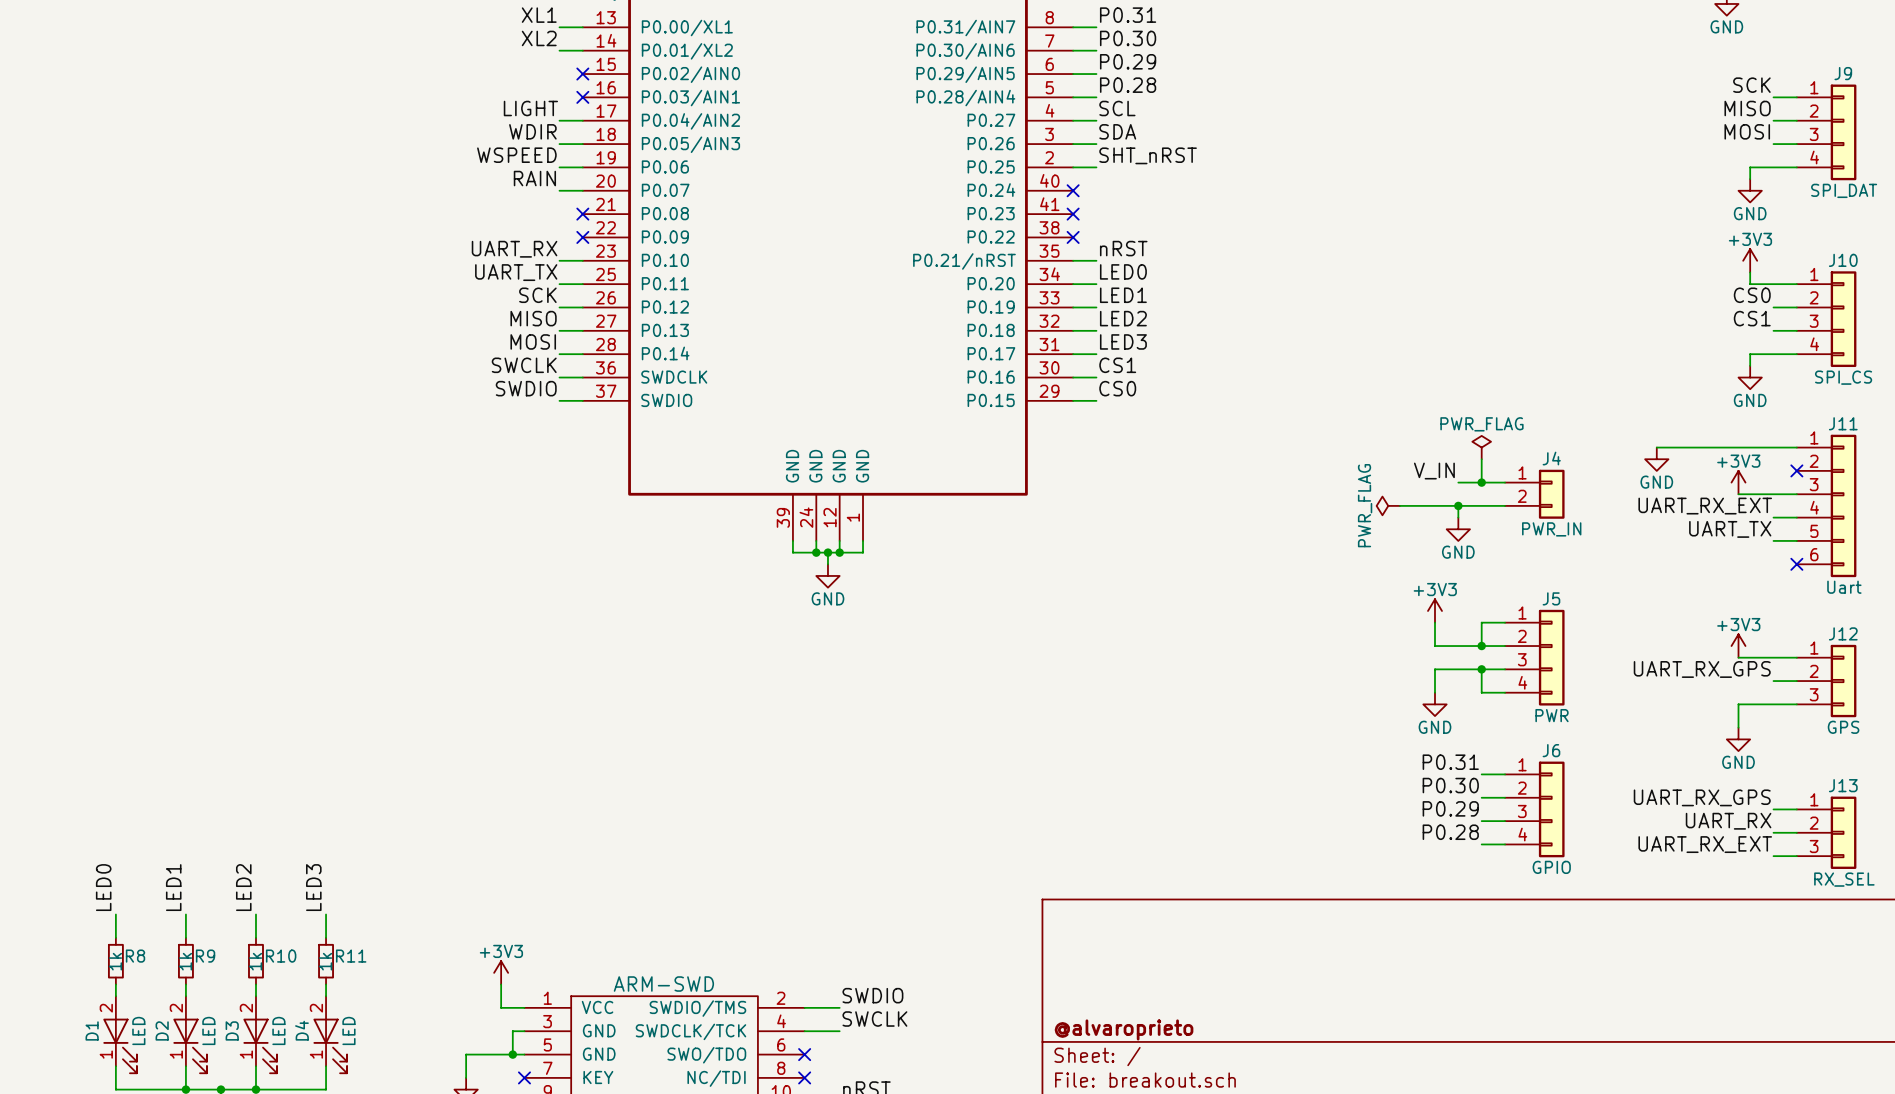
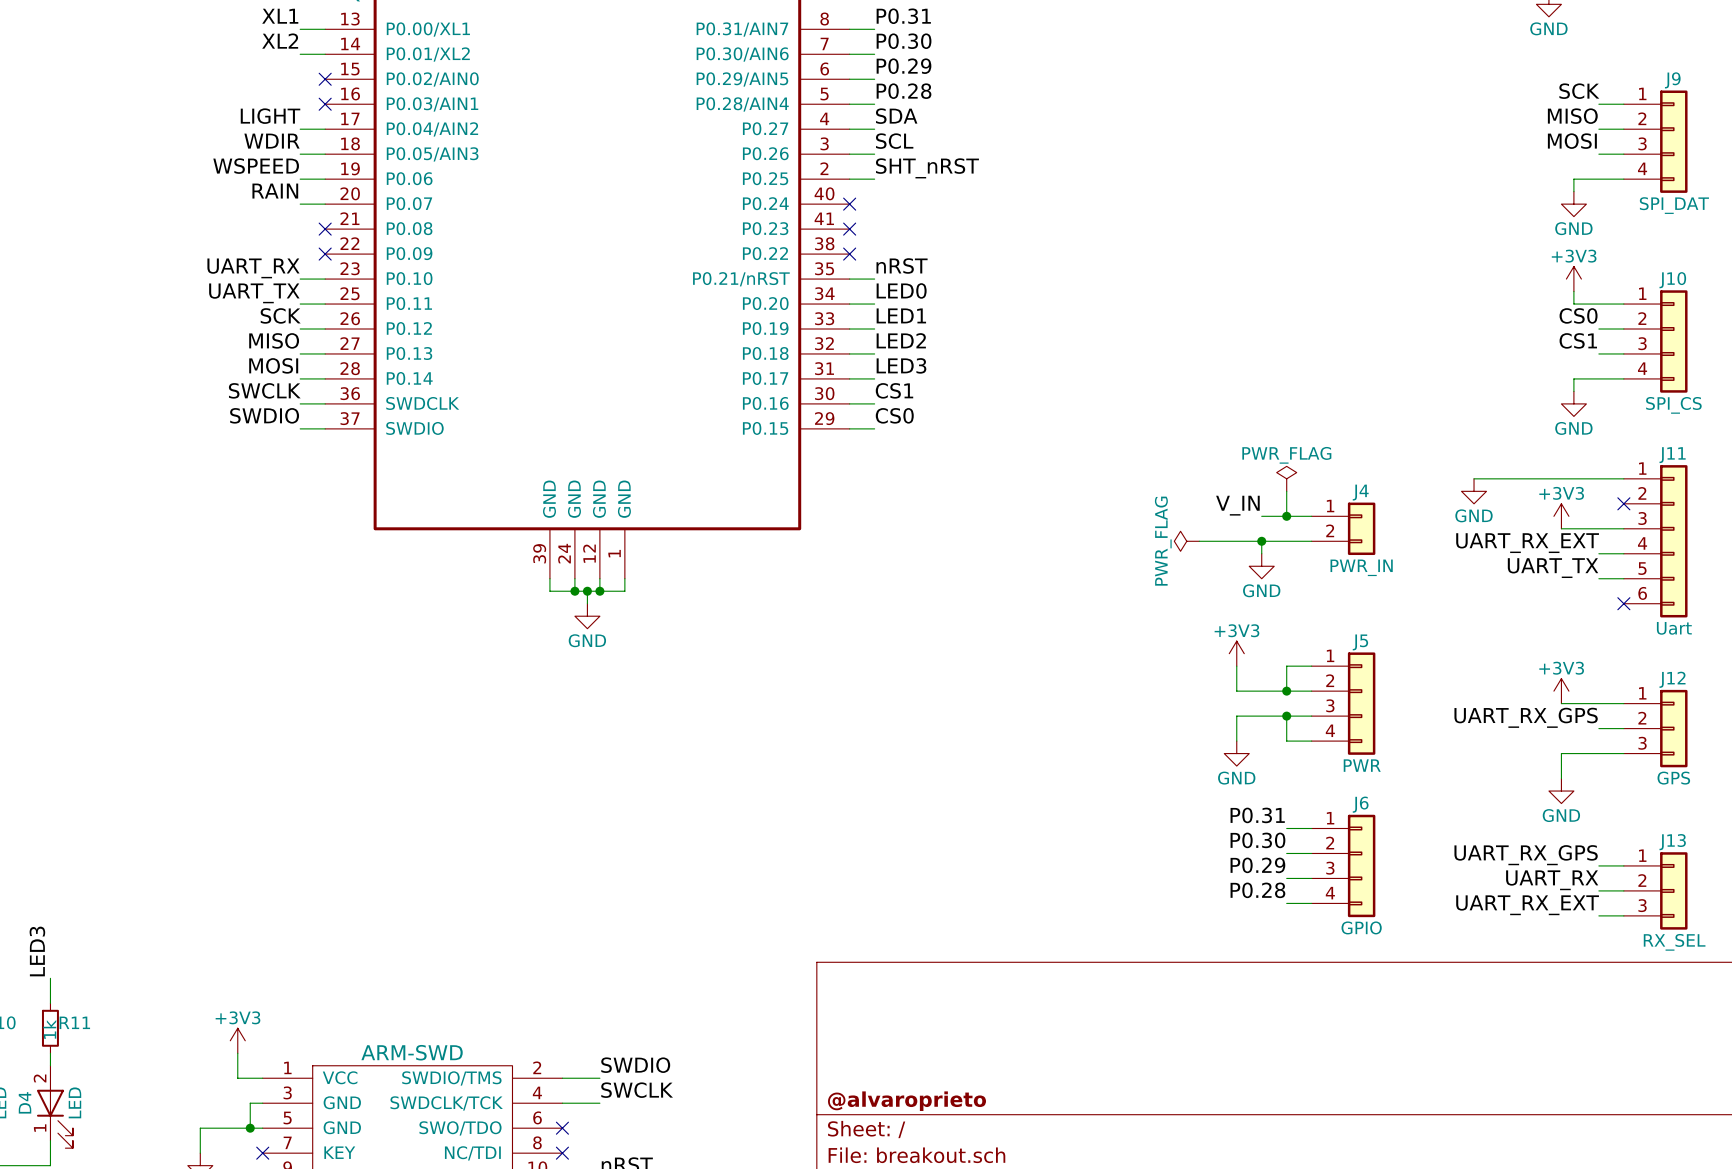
label: SCL (1117, 108) -> SDA (896, 116)
label: SDA (1117, 131) -> SCL (894, 141)

